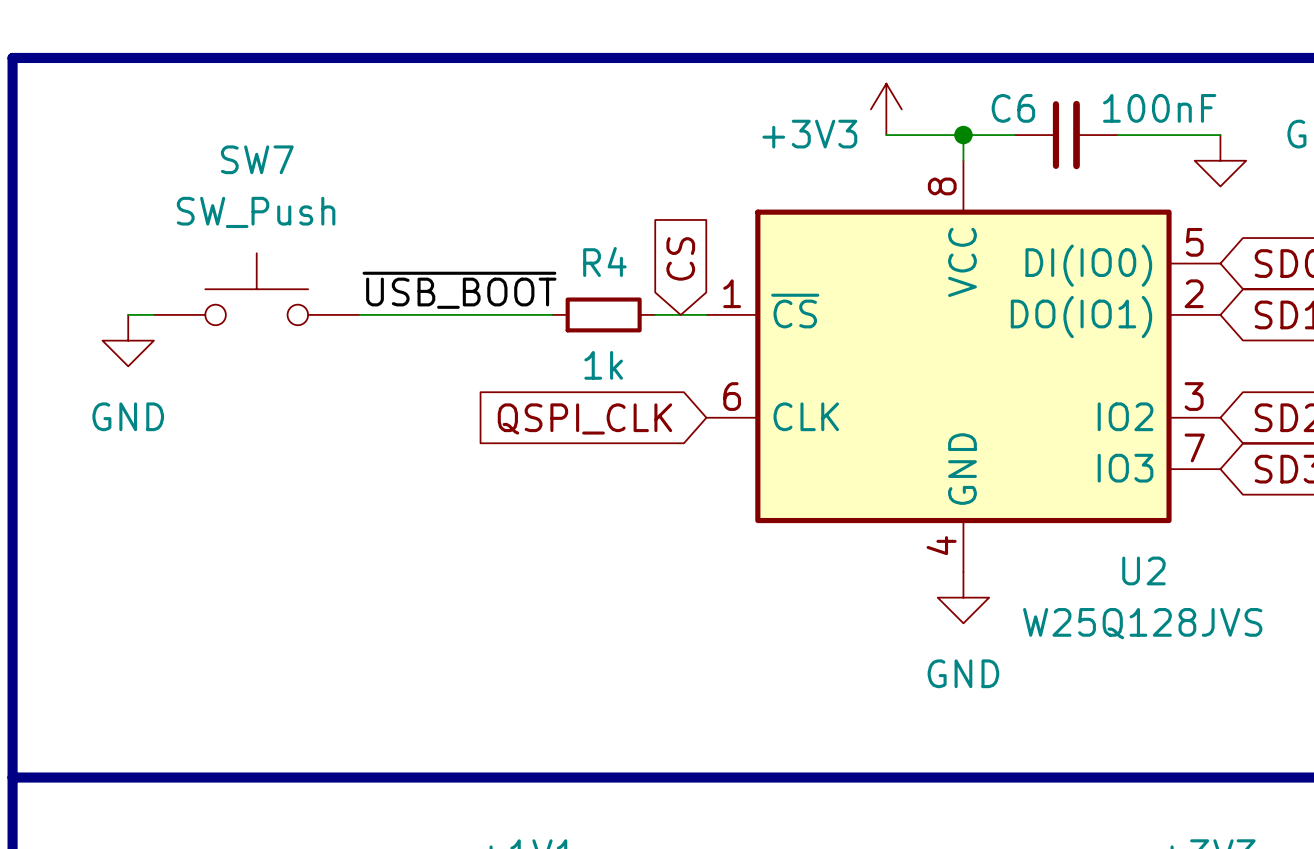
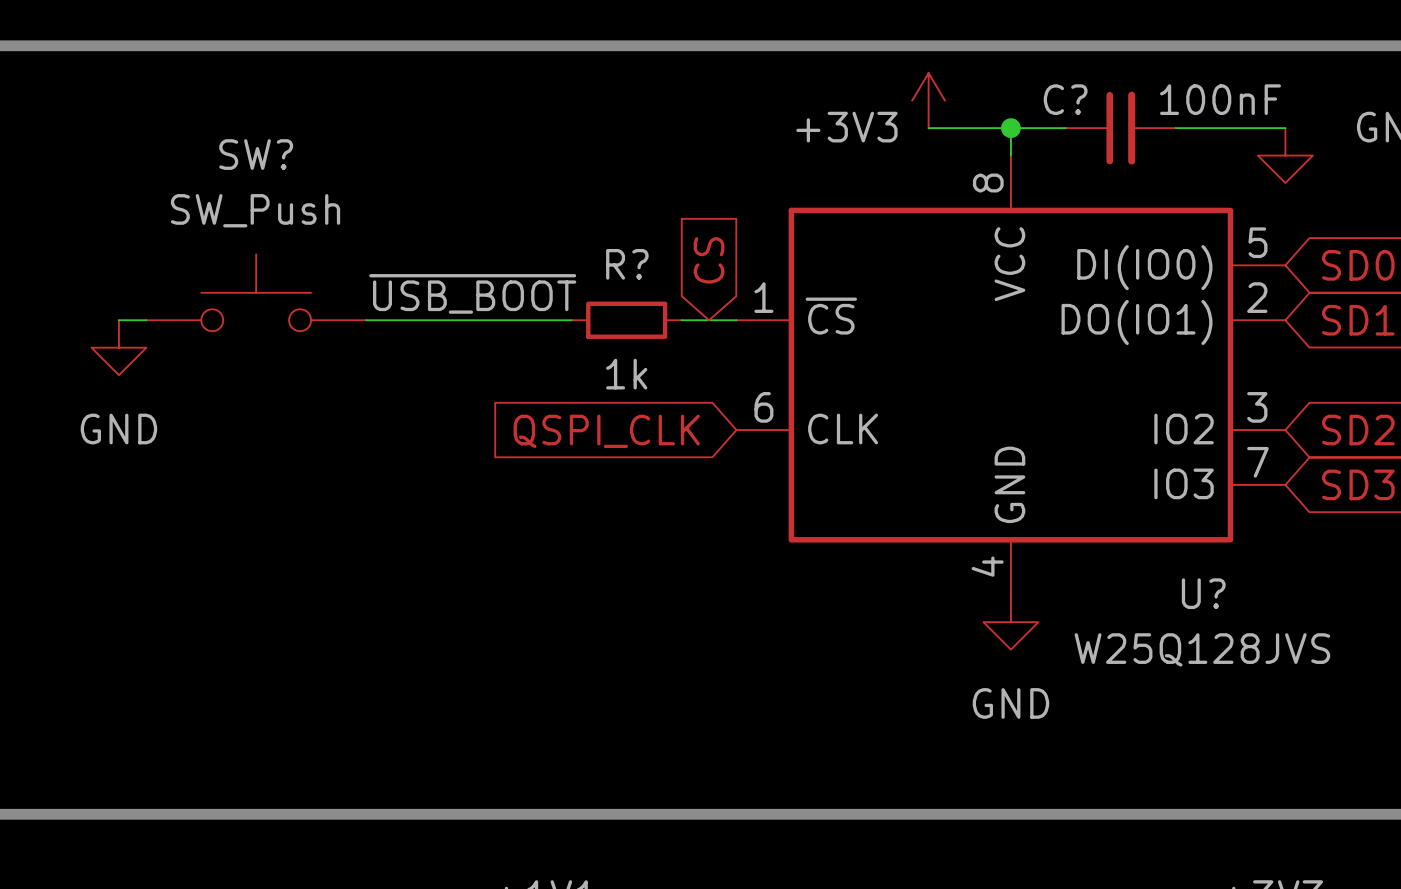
C6 name: C6 (1013, 108) -> C? (1065, 99)
SW7 name: SW7 (257, 159) -> SW? (256, 154)
R4 name: R4 (604, 261) -> R? (627, 264)
U2 name: U2 (1143, 570) -> U? (1203, 593)

